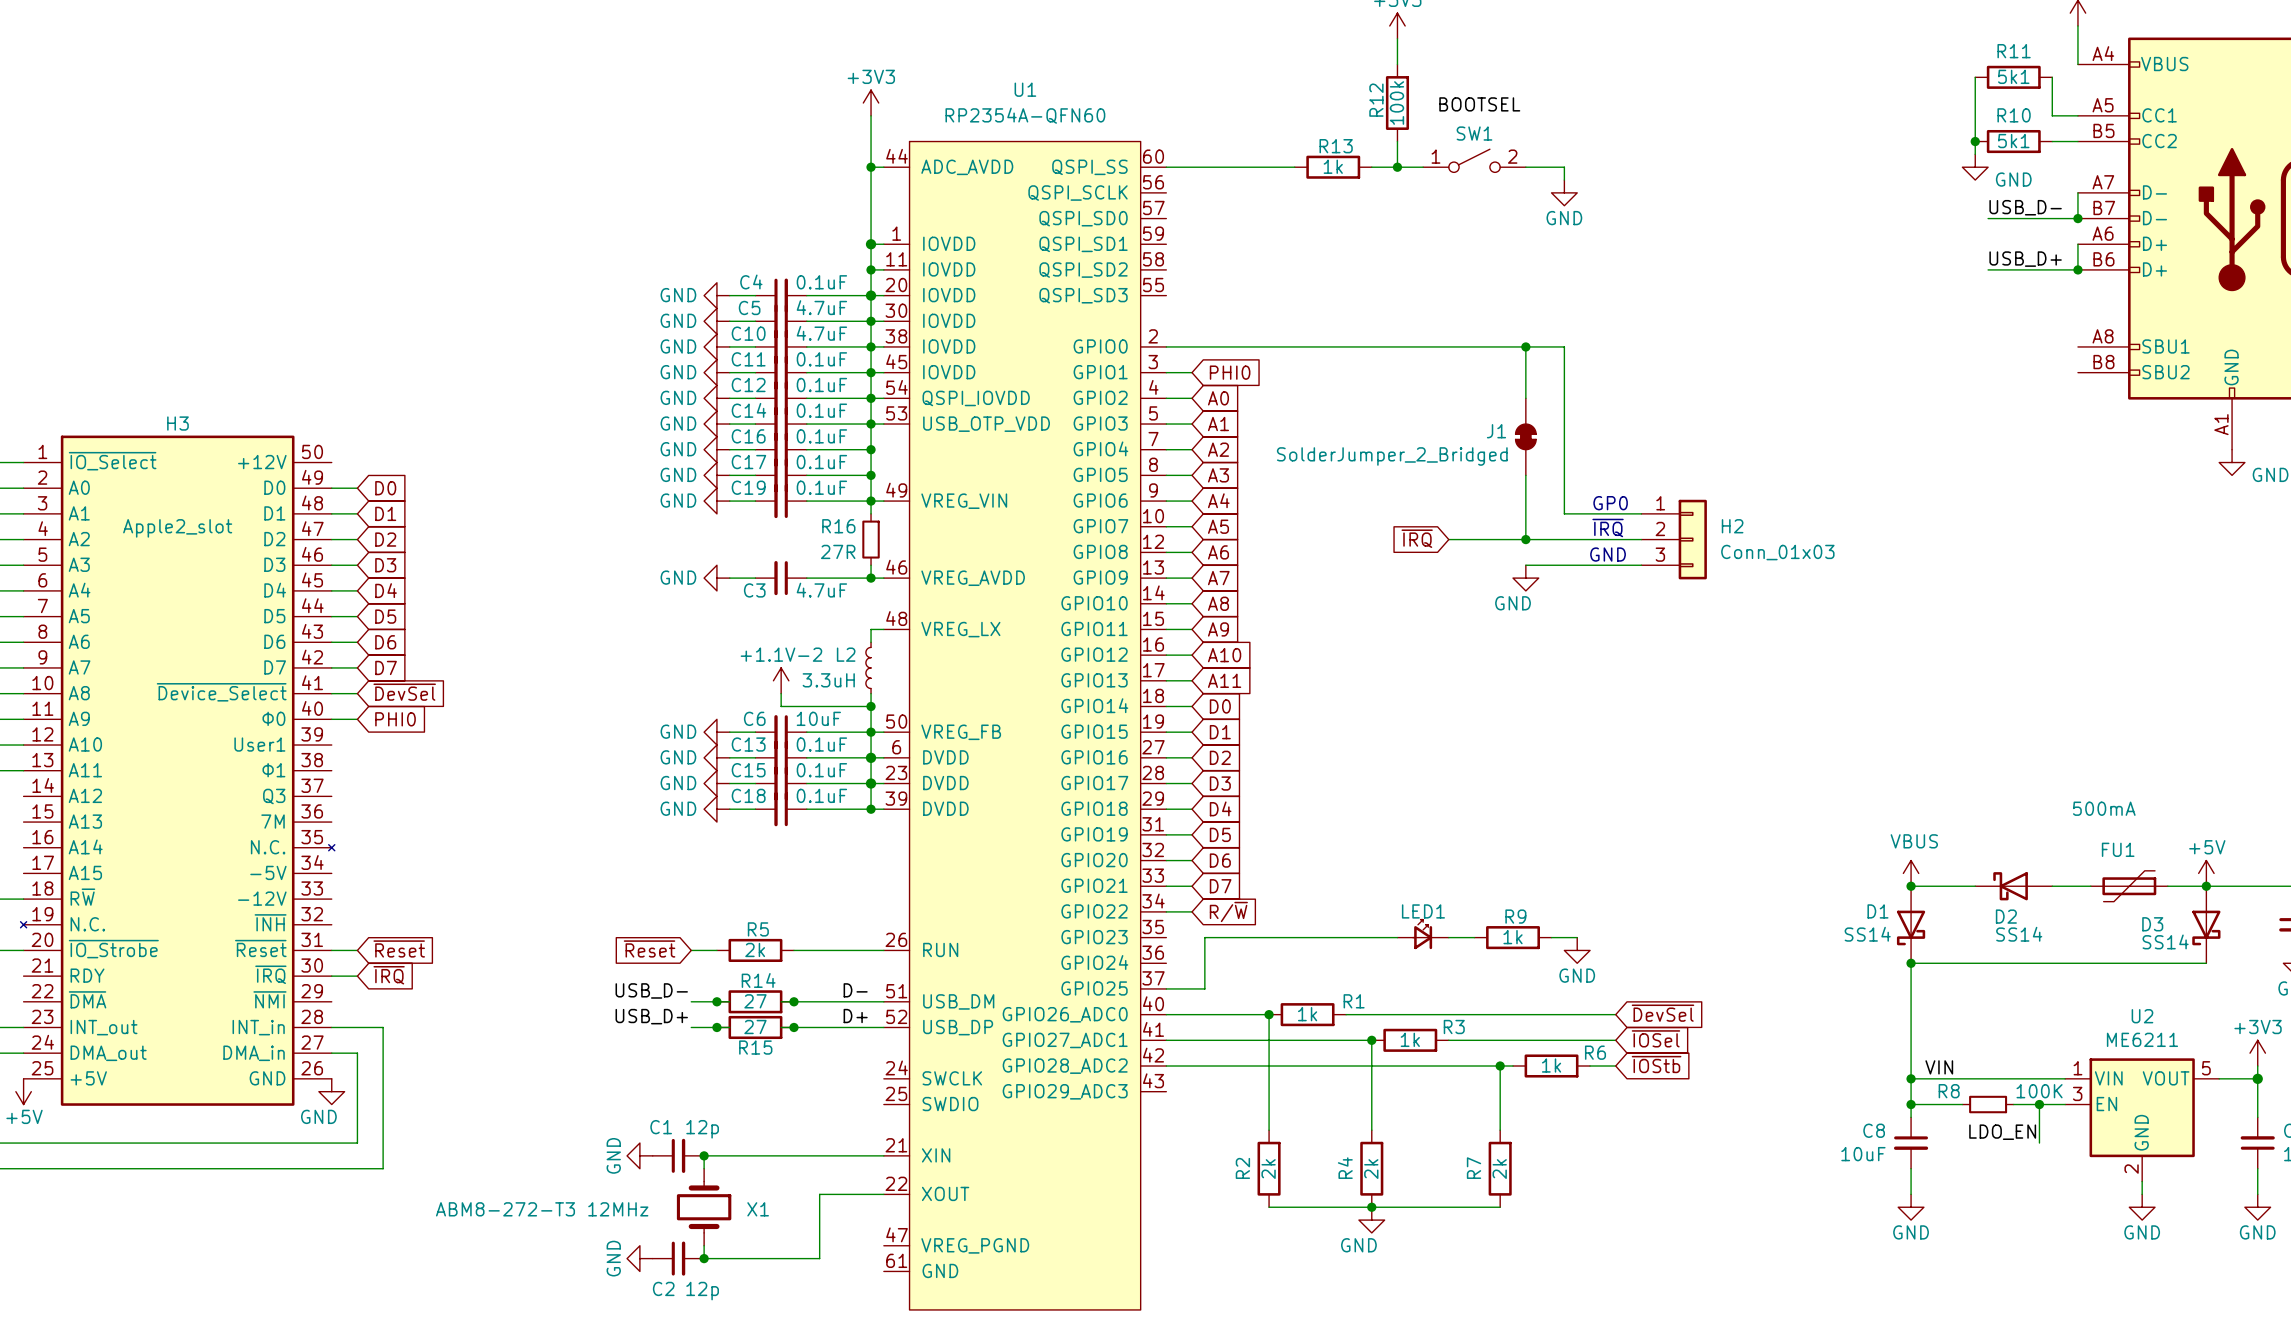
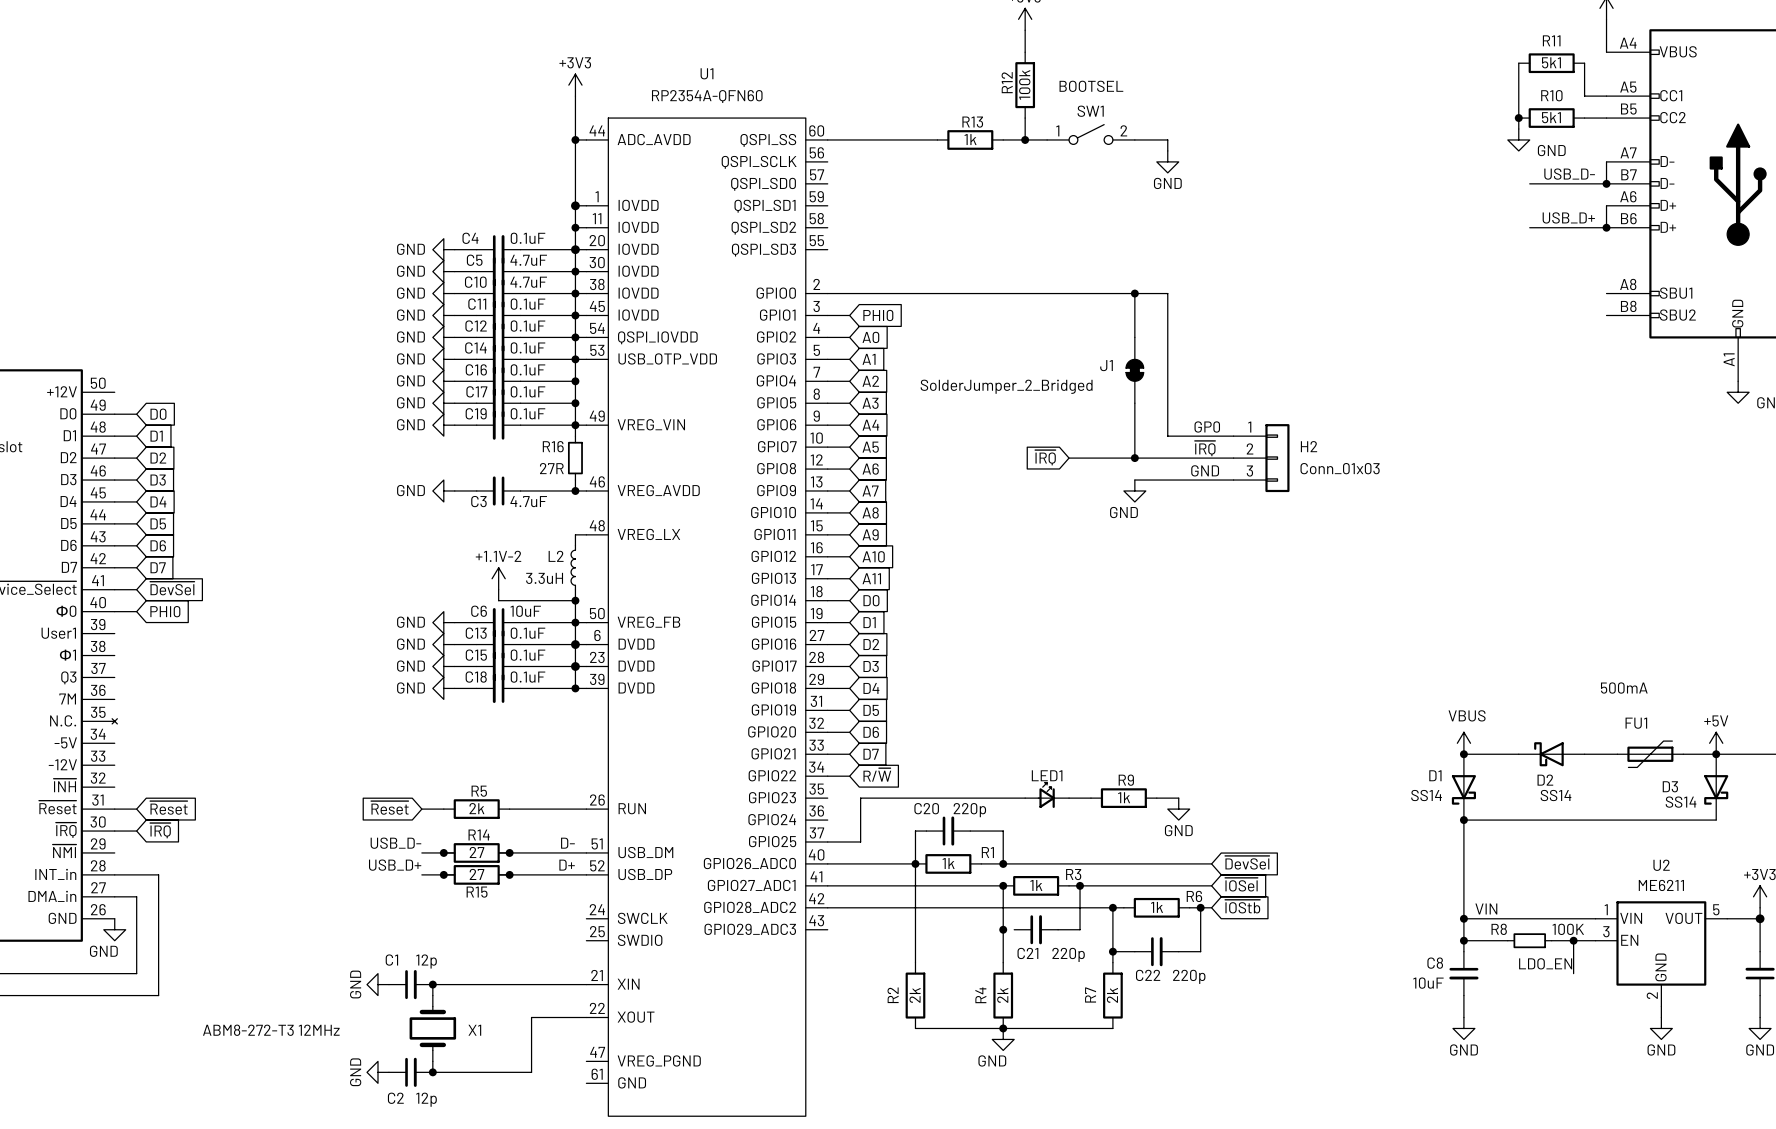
wire: none -> (926, 831) (915, 831) (915, 863)
C20: none -> 220p (948, 831)
wire: none -> (970, 831) (1003, 831) (1003, 863)
junction: none -> (1003, 863)
wire: none -> (1080, 885) (1080, 929) (1058, 929)
junction: none -> (1080, 885)
wire: none -> (1200, 907) (1200, 951) (1178, 951)
junction: none -> (1200, 907)
junction: none -> (1003, 929)
C21: none -> 220p (1036, 929)
wire: none -> (1112, 951) (1134, 951)
junction: none -> (1112, 951)
C22: none -> 220p (1156, 951)

